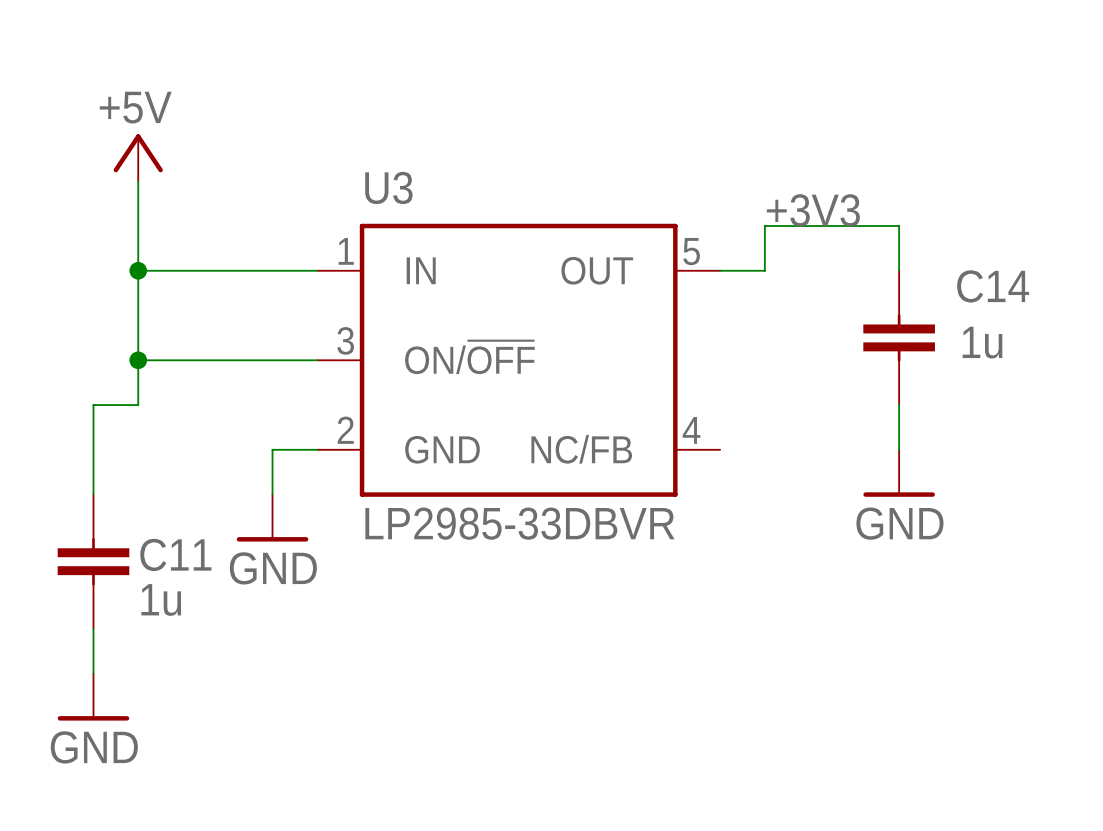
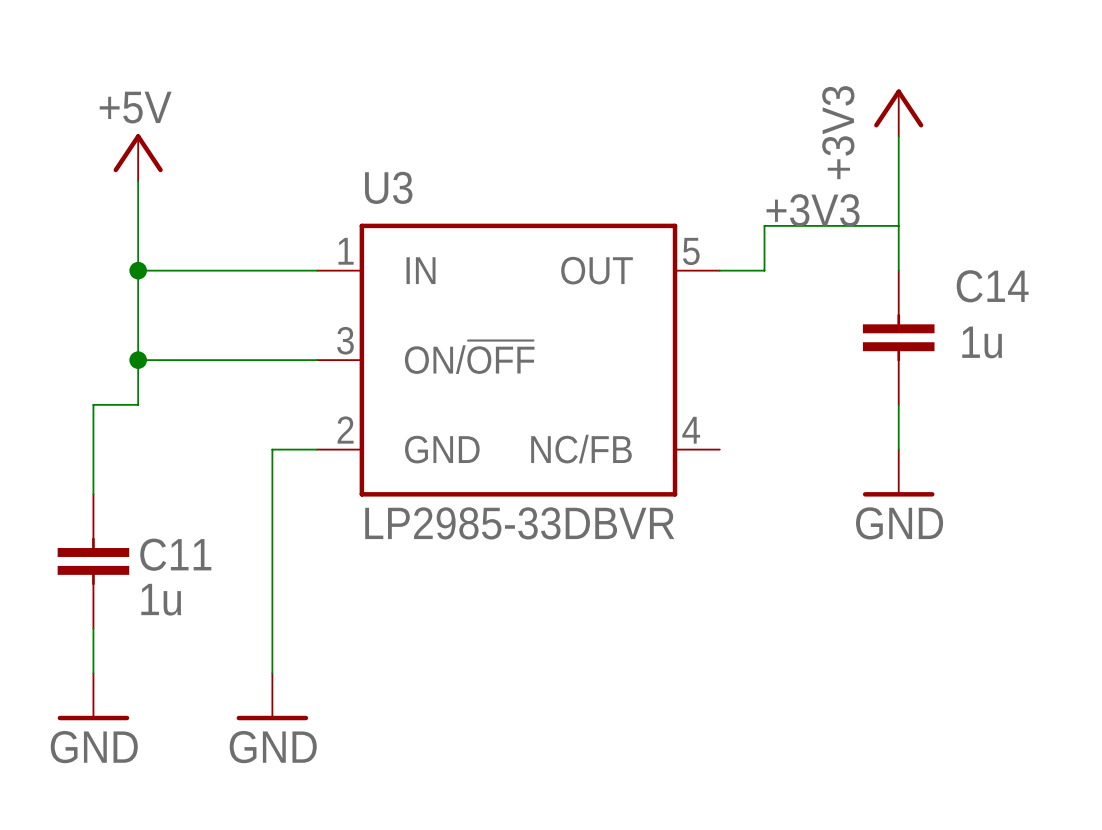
power symbol: none -> +3V3 (898, 112)
wire: none -> (898, 136) (898, 225)
wire: none -> (272, 494) (272, 673)
power symbol position: GND (272, 518) -> GND (272, 696)

